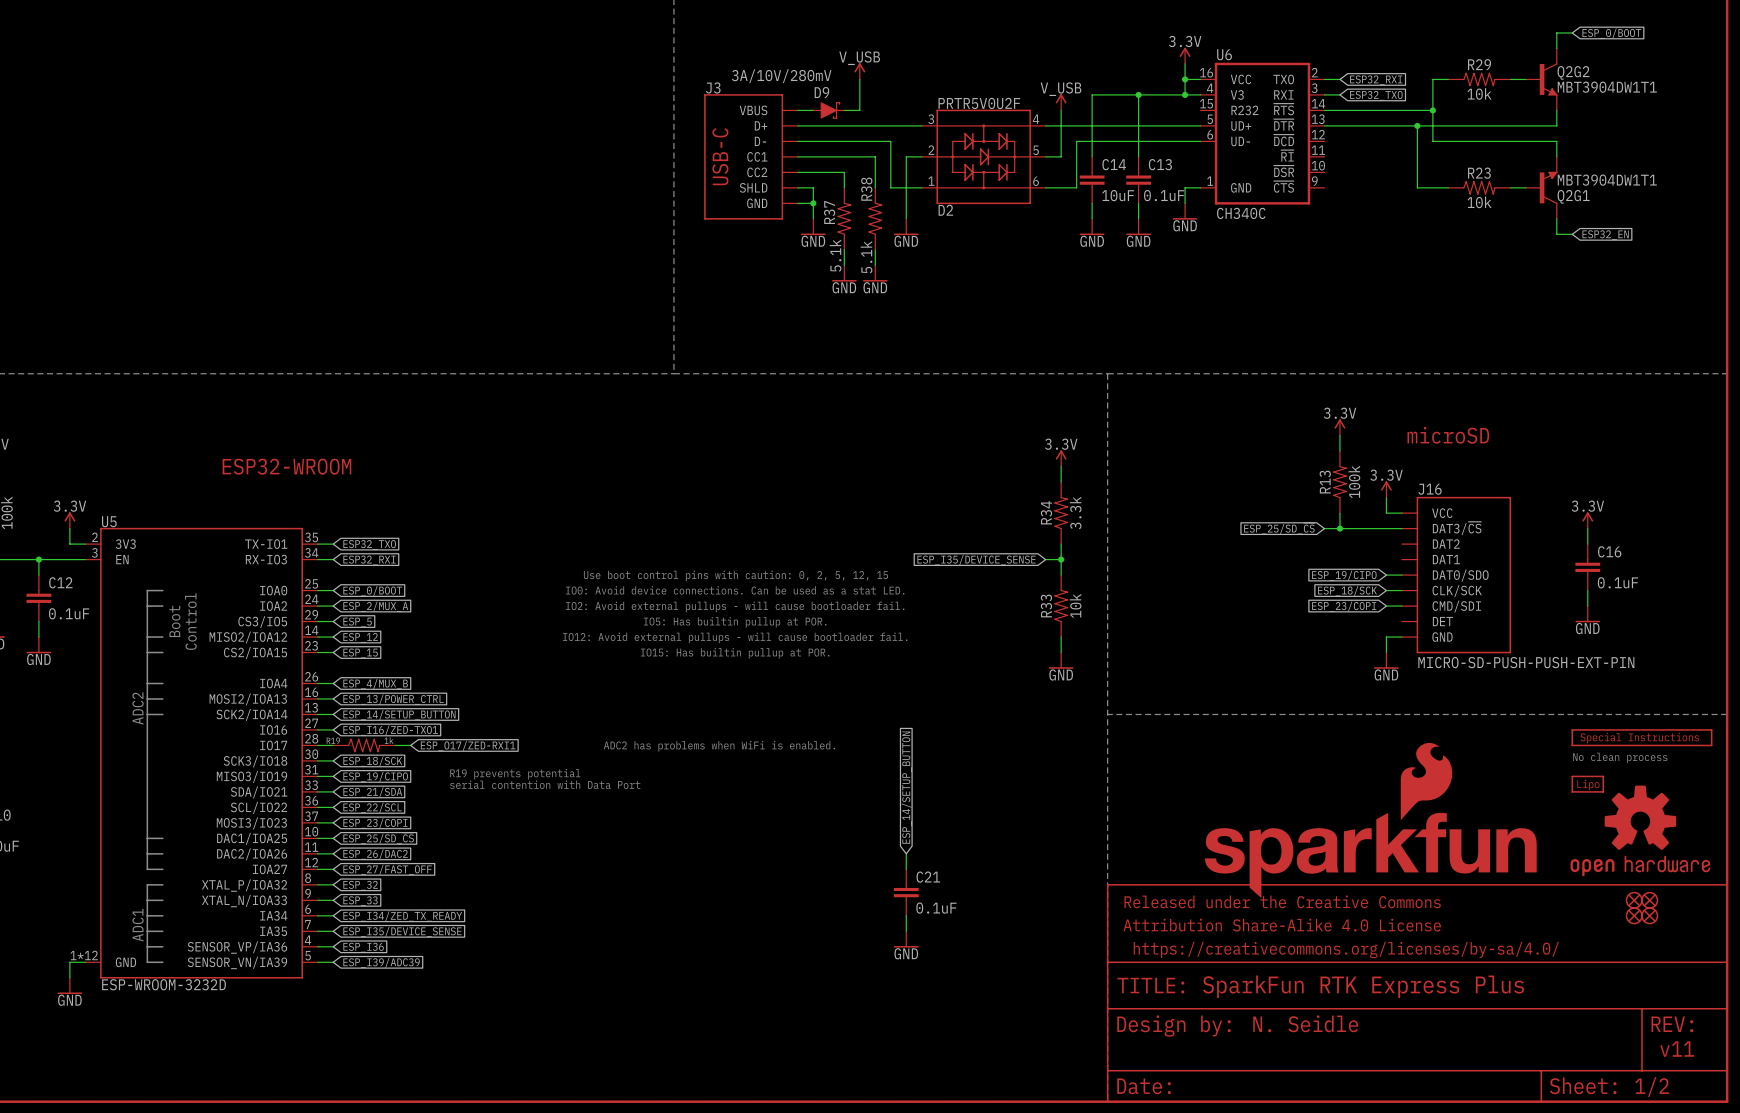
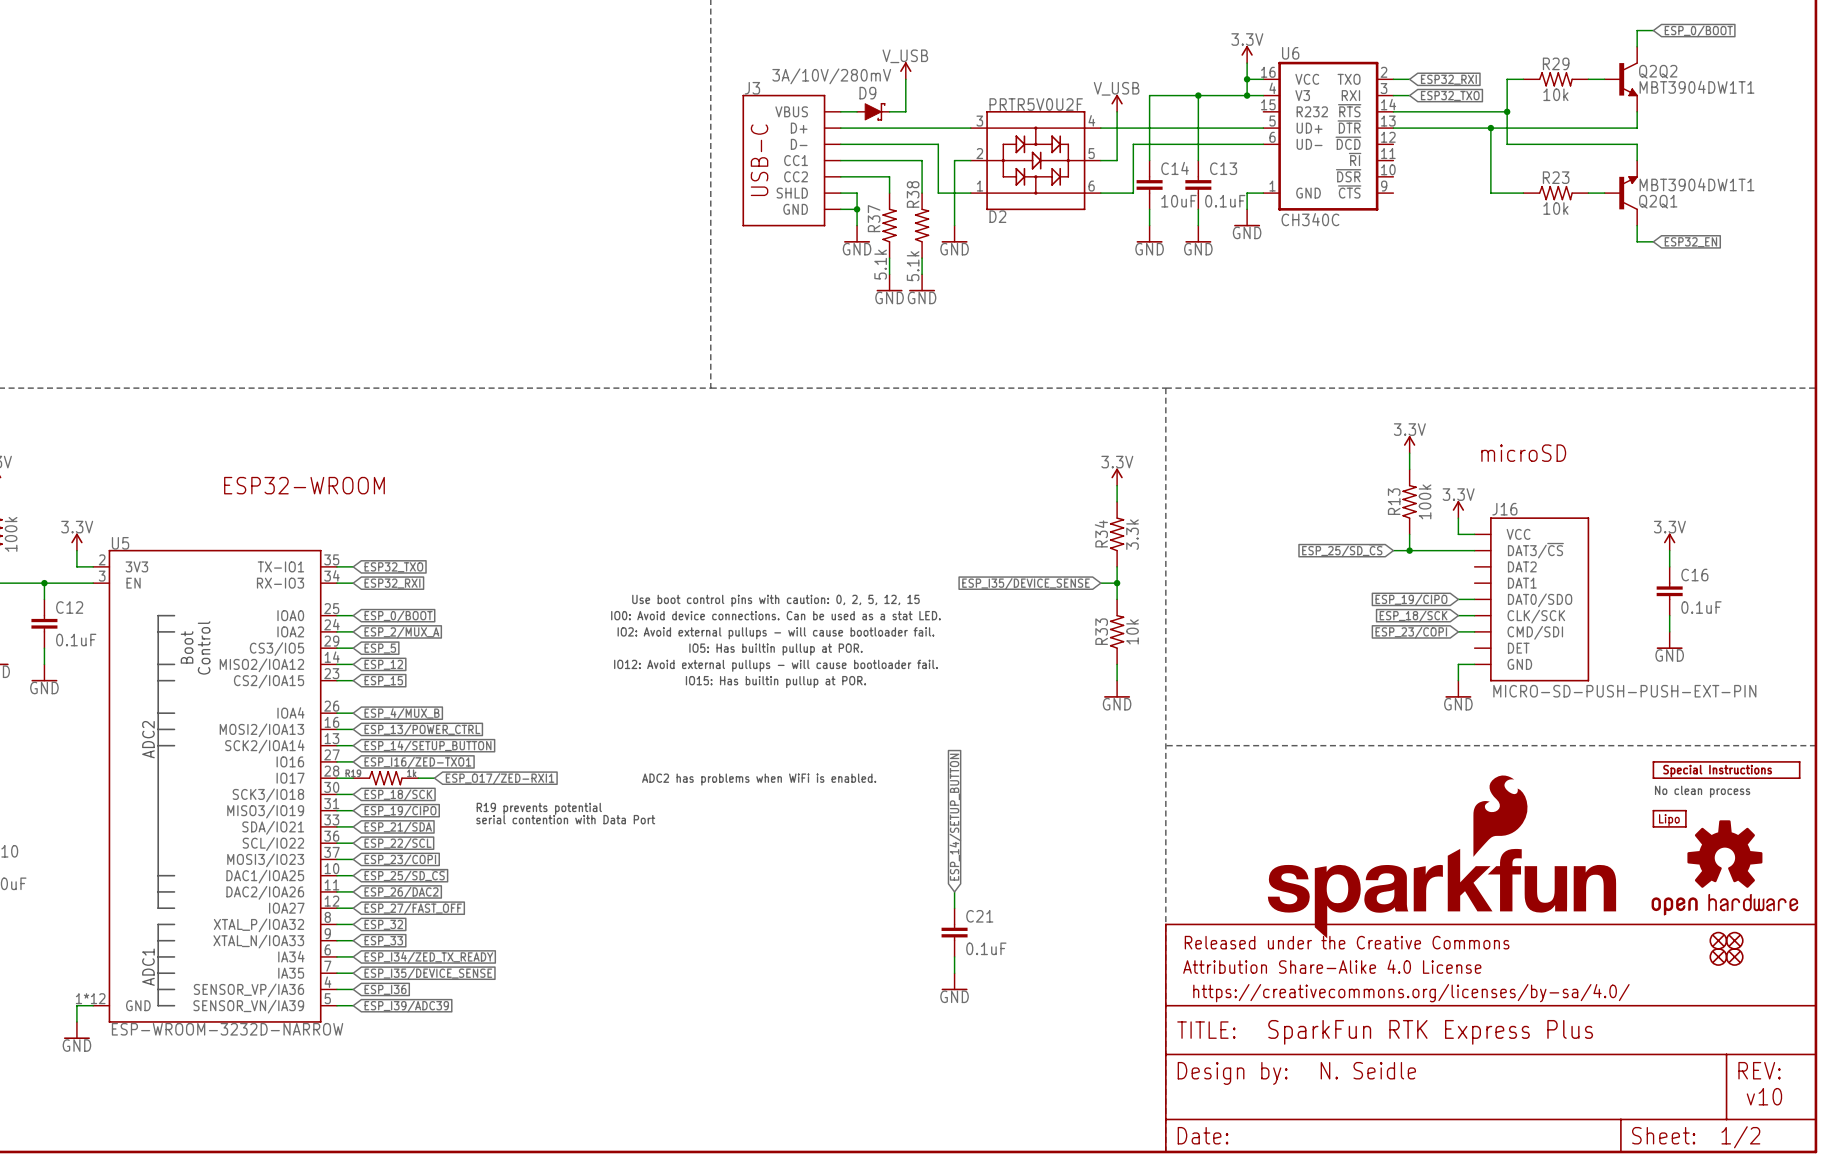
Q2G2 name: Q2G2 (1573, 72) -> Q2Q2 (1658, 71)
Q2G1 name: Q2G1 (1573, 196) -> Q2Q1 (1658, 201)
U5 value: ESP-WROOM-3232D (164, 984) -> ESP-WROOM-3232D-NARROW (227, 1029)
text: v11 (1677, 1049) -> v10 (1764, 1096)

